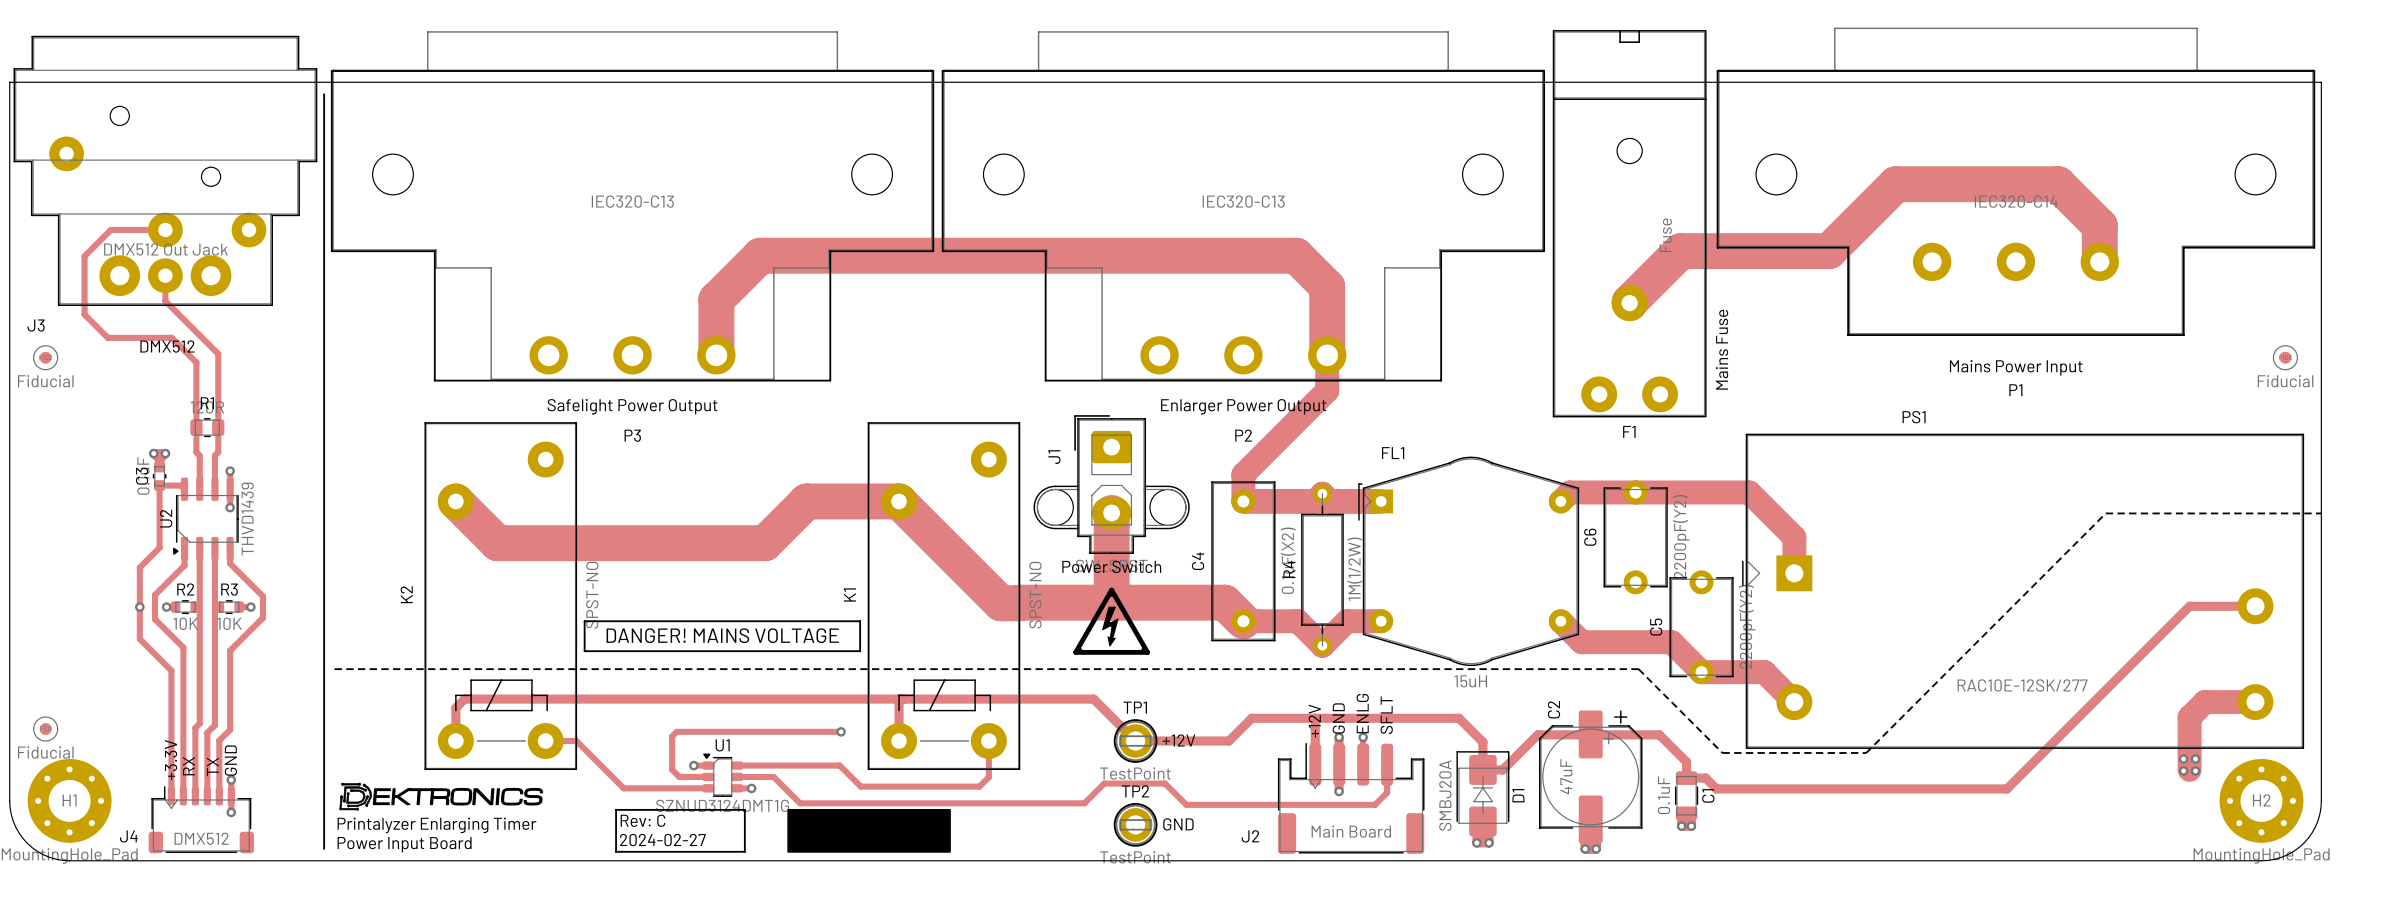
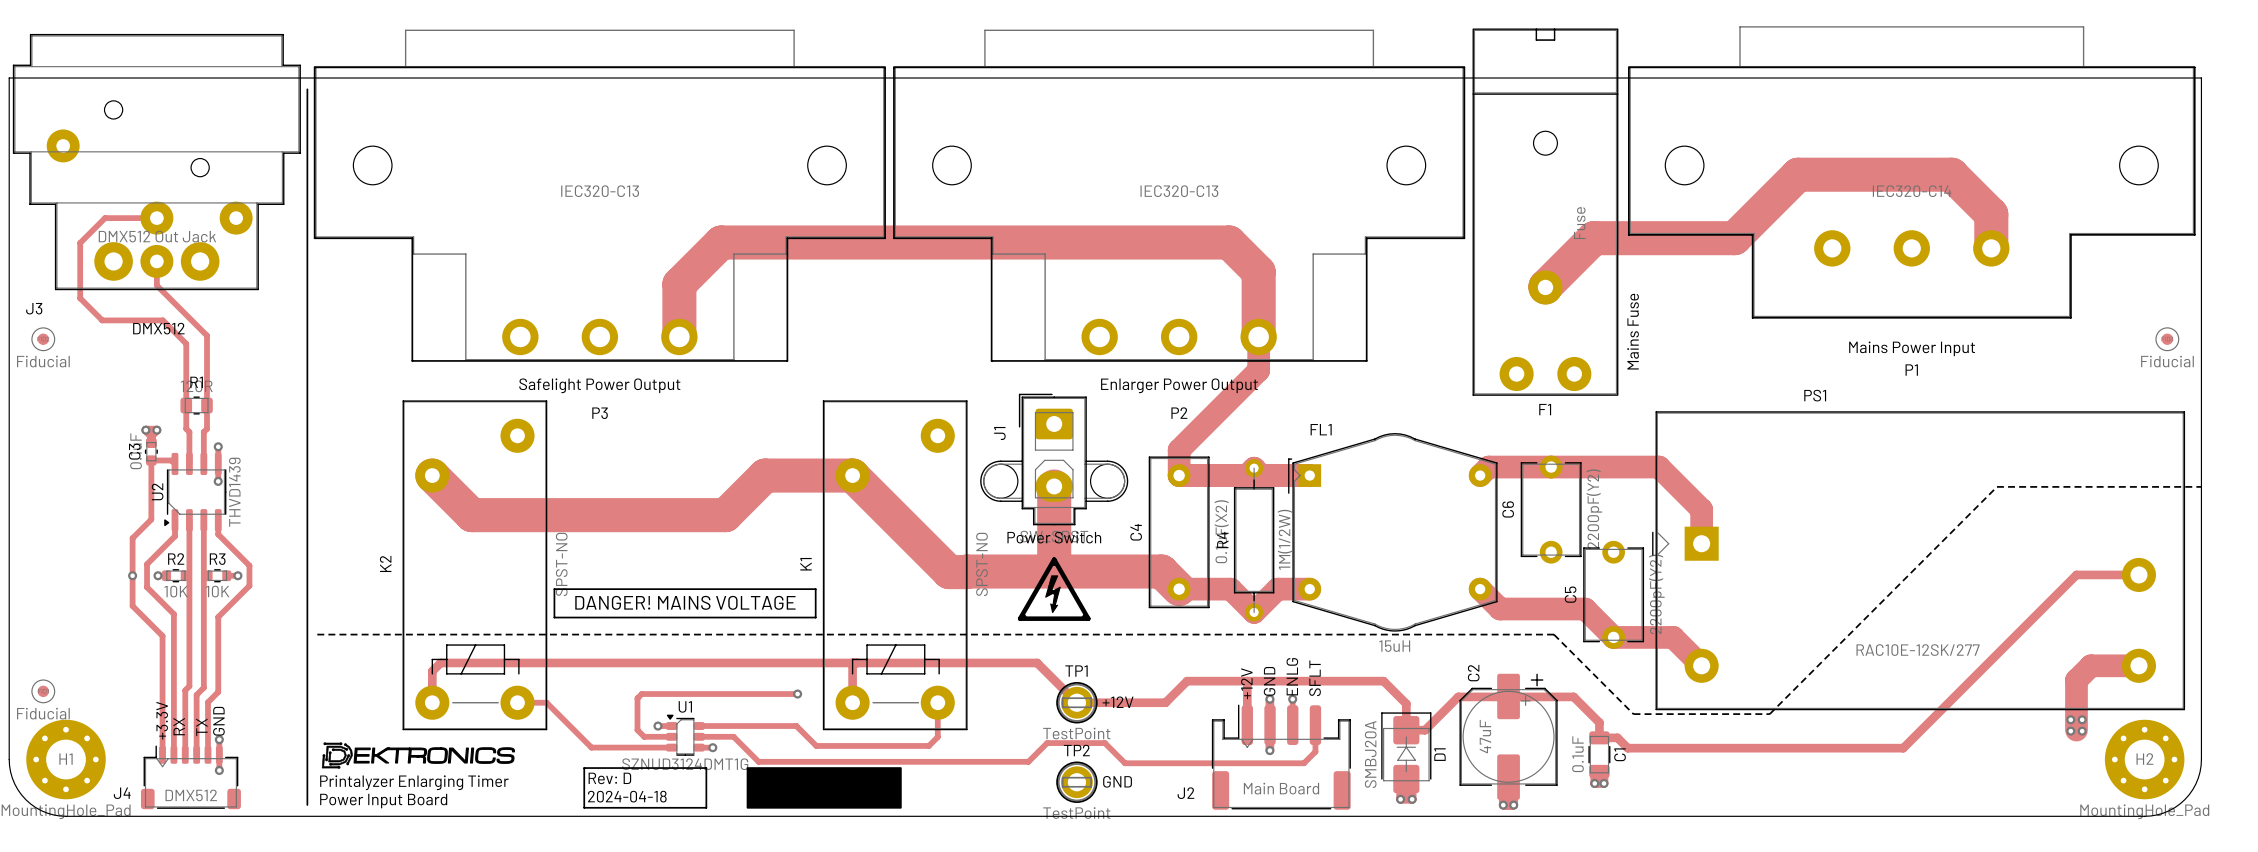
text: Rev: C (642, 820) -> Rev: D (609, 778)
text: 2024-02-27 (662, 840) -> 2024-04-18 (627, 796)

